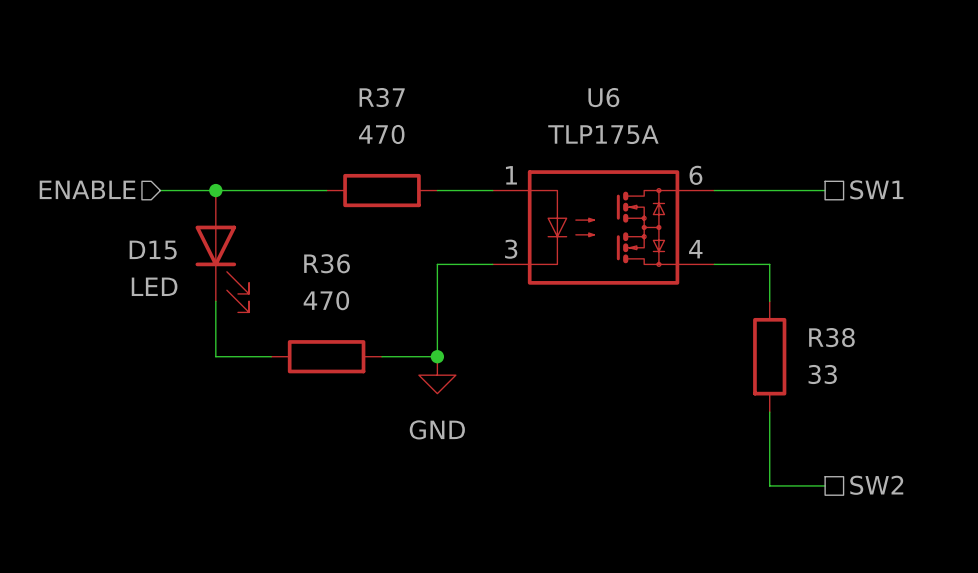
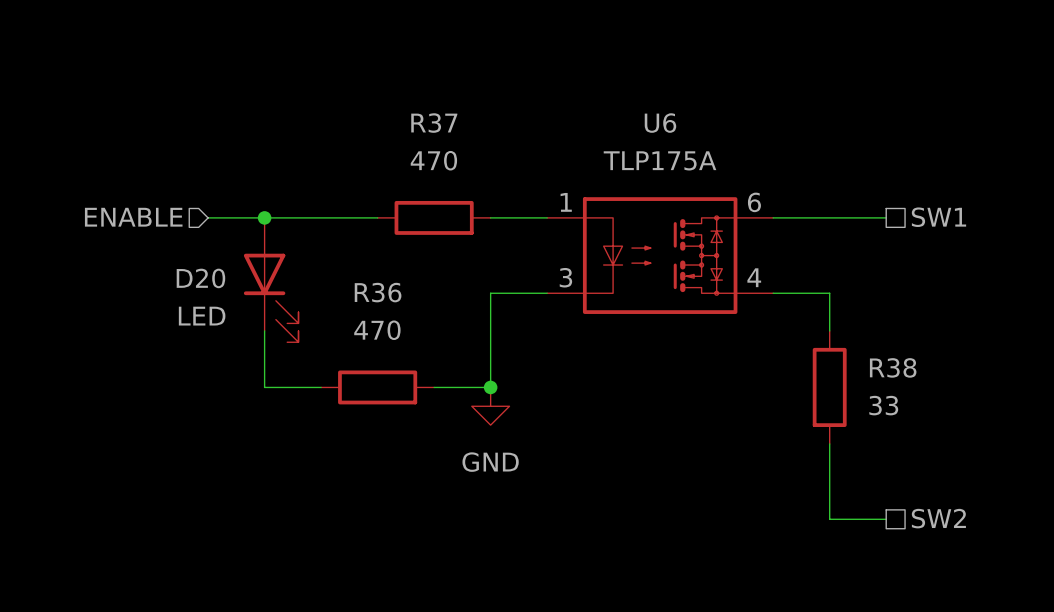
D15 name: D15 (153, 250) -> D20 (200, 278)

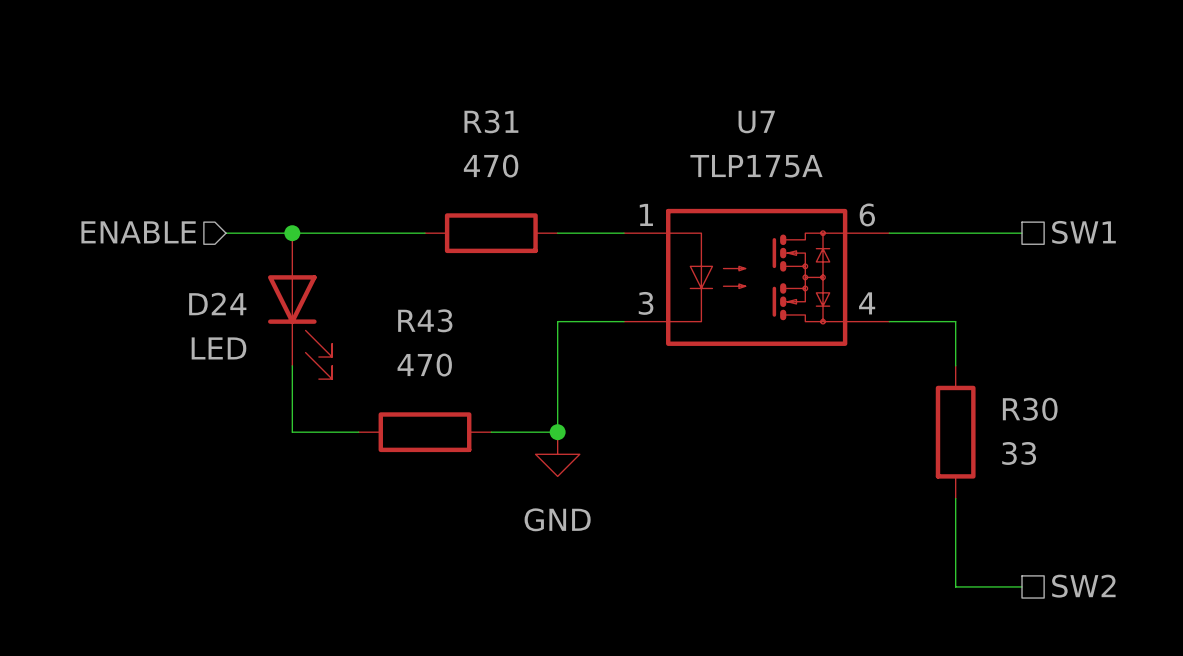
R37 name: R37 (434, 123) -> R31 (491, 121)
U6 name: U6 (660, 123) -> U7 (756, 122)
D20 name: D20 (200, 278) -> D24 (217, 304)
R36 name: R36 (378, 292) -> R43 (425, 320)
R38 name: R38 (893, 367) -> R30 (1030, 409)

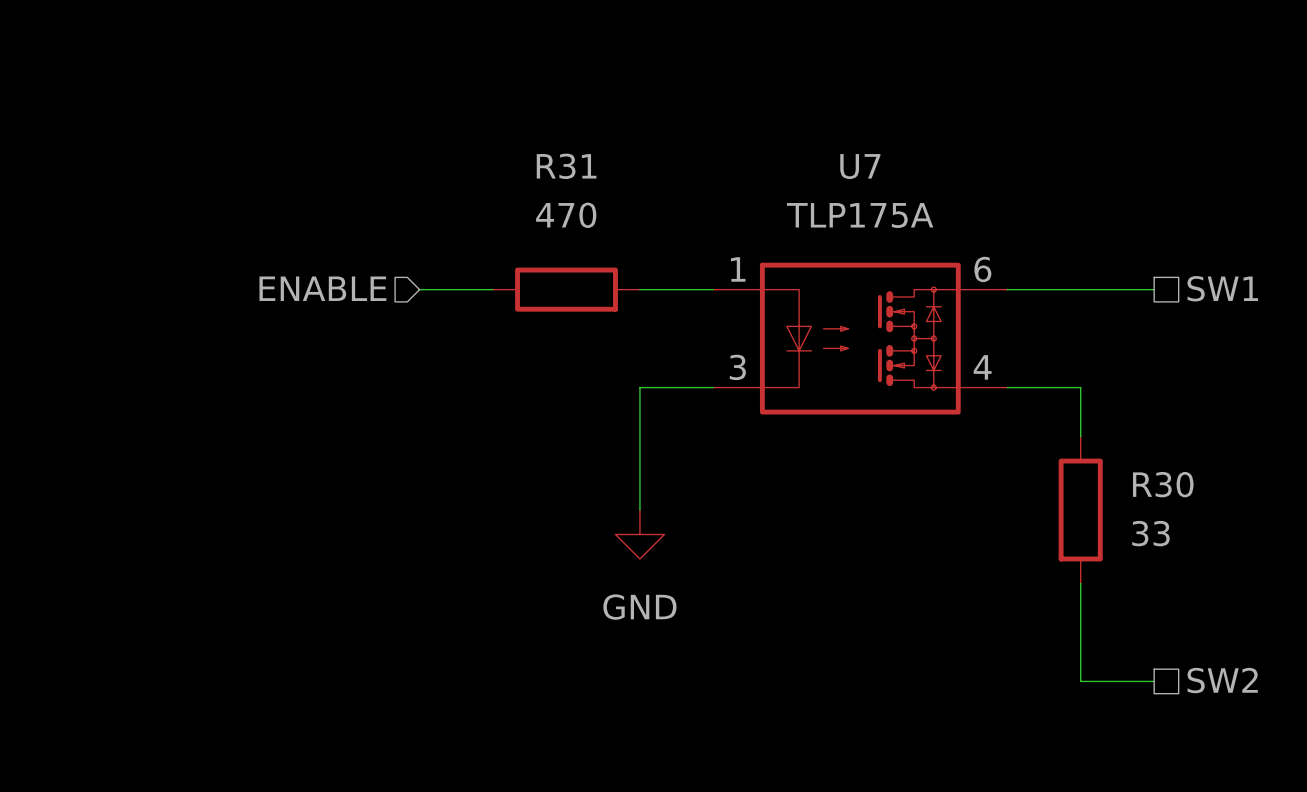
hierarchical label position: ENABLE (138, 232) -> ENABLE (322, 288)
wire: (226, 233) (358, 233) -> none
junction: (292, 233) -> none
D24: LED (300, 306) -> none
wire: (292, 365) (292, 432) (358, 432) -> none
R43: 470 (425, 432) -> none
wire: (491, 432) (557, 432) -> none
junction: (557, 432) -> none

